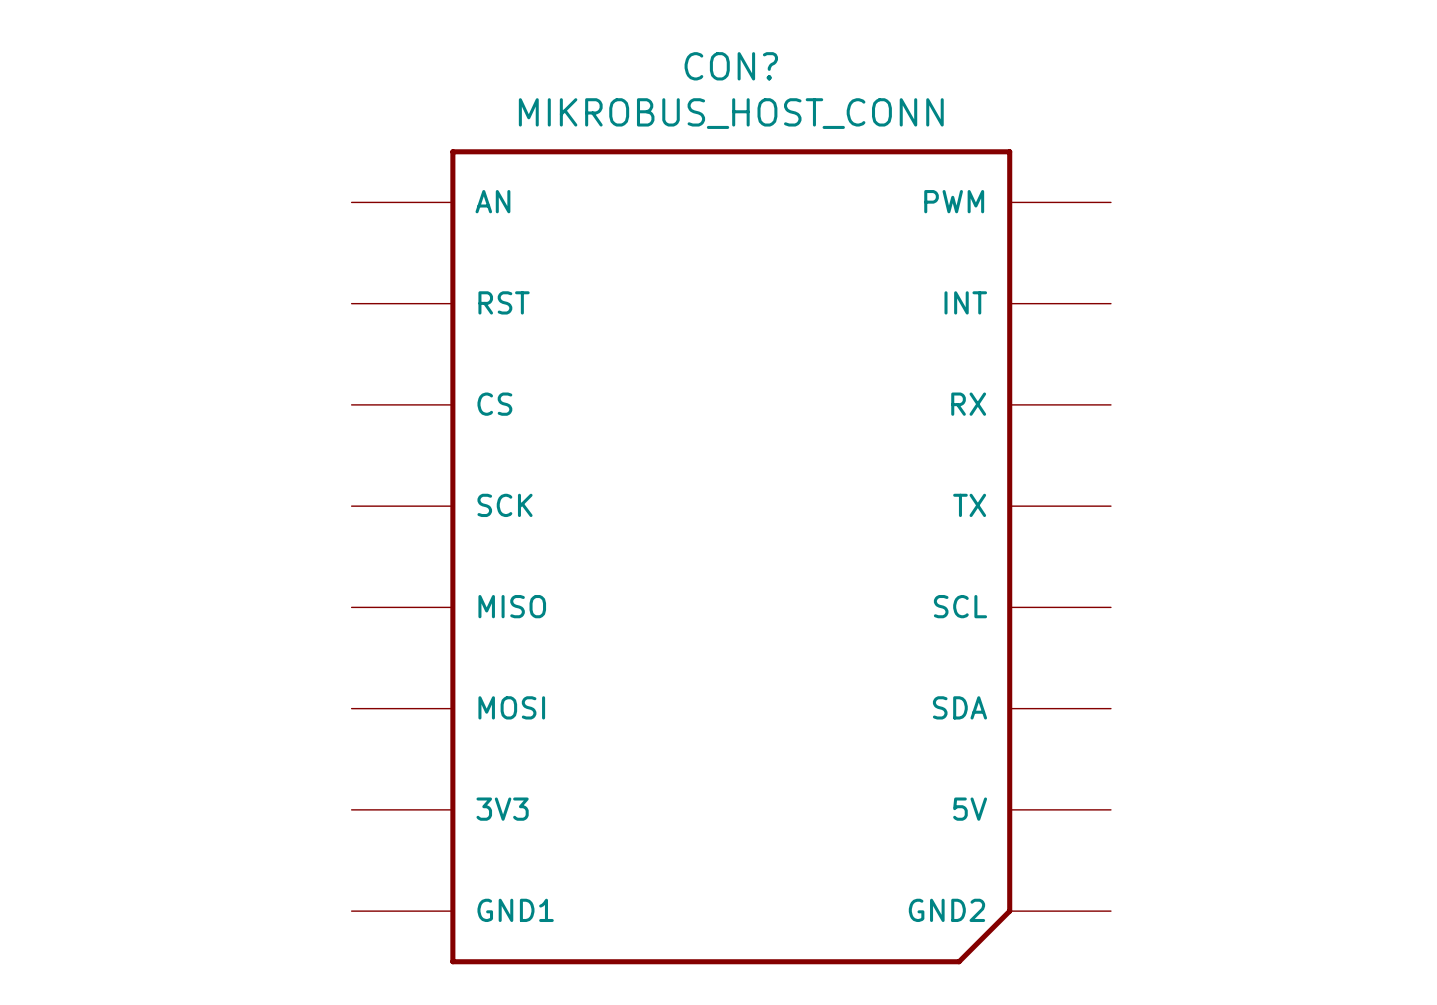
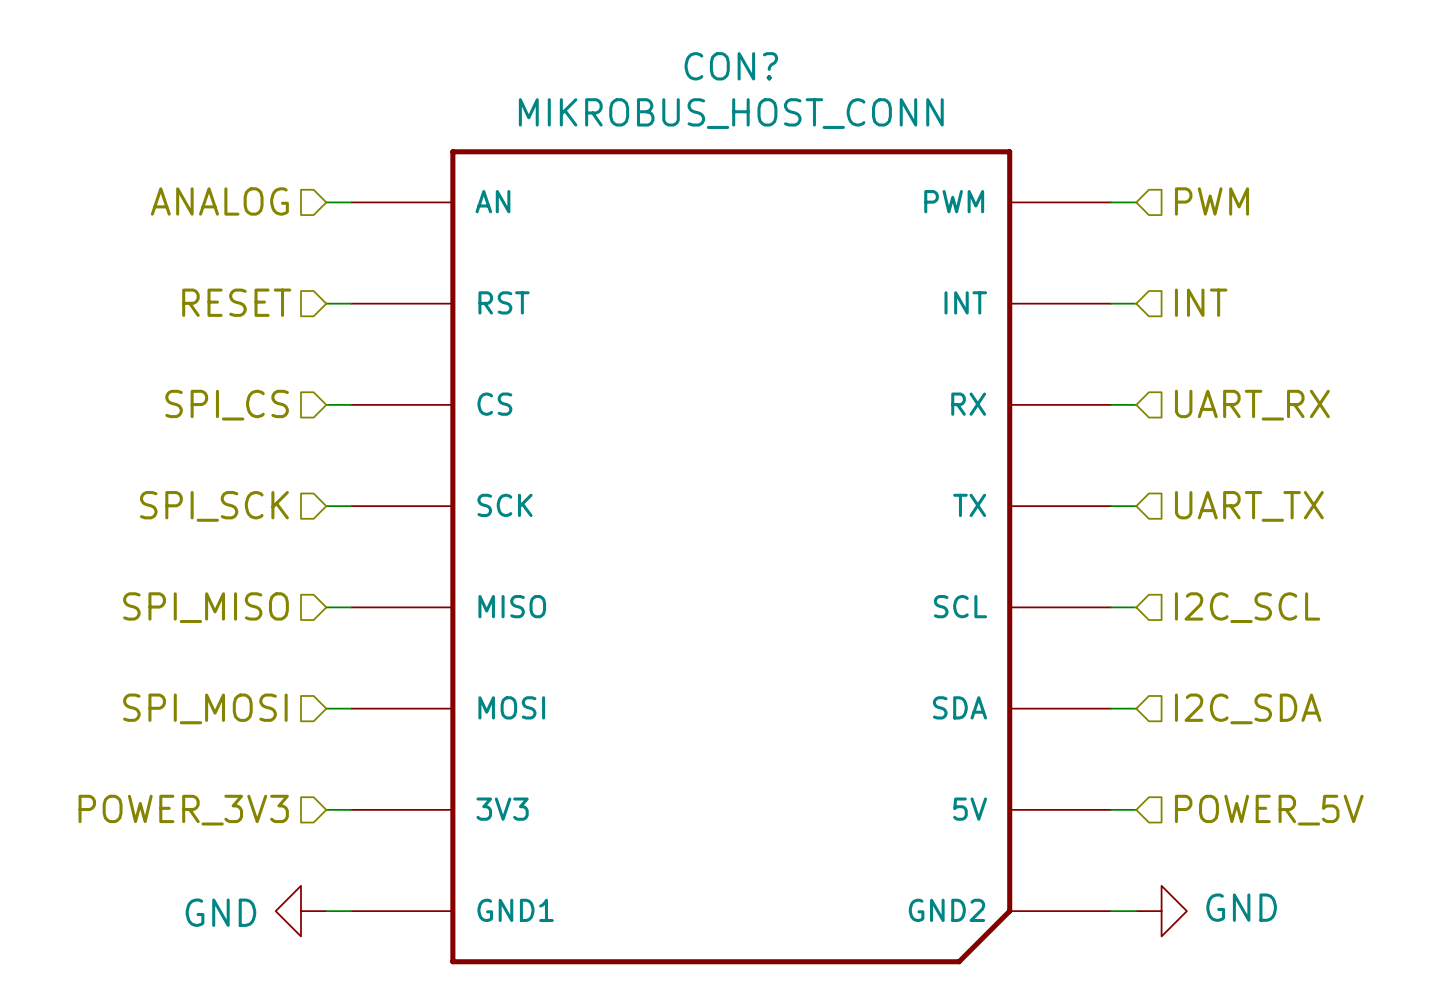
hierarchical label: none -> ANALOG (219, 201)
hierarchical label: none -> PWM (1211, 201)
wire: none -> (326, 202) (351, 202)
wire: none -> (1110, 202) (1136, 202)
hierarchical label: none -> RESET (236, 302)
hierarchical label: none -> INT (1201, 302)
wire: none -> (326, 303) (351, 303)
wire: none -> (1110, 303) (1136, 303)
wire: none -> (326, 404) (351, 404)
wire: none -> (1110, 404) (1136, 404)
hierarchical label: none -> SPI_CS (227, 405)
hierarchical label: none -> UART_RX (1252, 405)
hierarchical label: none -> SPI_SCK (214, 506)
wire: none -> (326, 506) (351, 506)
wire: none -> (1110, 506) (1136, 506)
hierarchical label: none -> UART_TX (1249, 506)
hierarchical label: none -> SPI_MISO (205, 607)
wire: none -> (326, 607) (351, 607)
wire: none -> (1110, 607) (1136, 607)
hierarchical label: none -> I2C_SCL (1247, 607)
hierarchical label: none -> SPI_MOSI (205, 708)
wire: none -> (326, 708) (351, 708)
wire: none -> (1110, 708) (1136, 708)
hierarchical label: none -> I2C_SDA (1248, 708)
wire: none -> (326, 809) (351, 809)
wire: none -> (1110, 809) (1136, 809)
hierarchical label: none -> POWER_3V3 (183, 810)
hierarchical label: none -> POWER_5V (1269, 810)
power symbol: none -> GND (301, 911)
wire: none -> (326, 911) (351, 911)
wire: none -> (1110, 911) (1136, 911)
power symbol: none -> GND (1161, 911)

